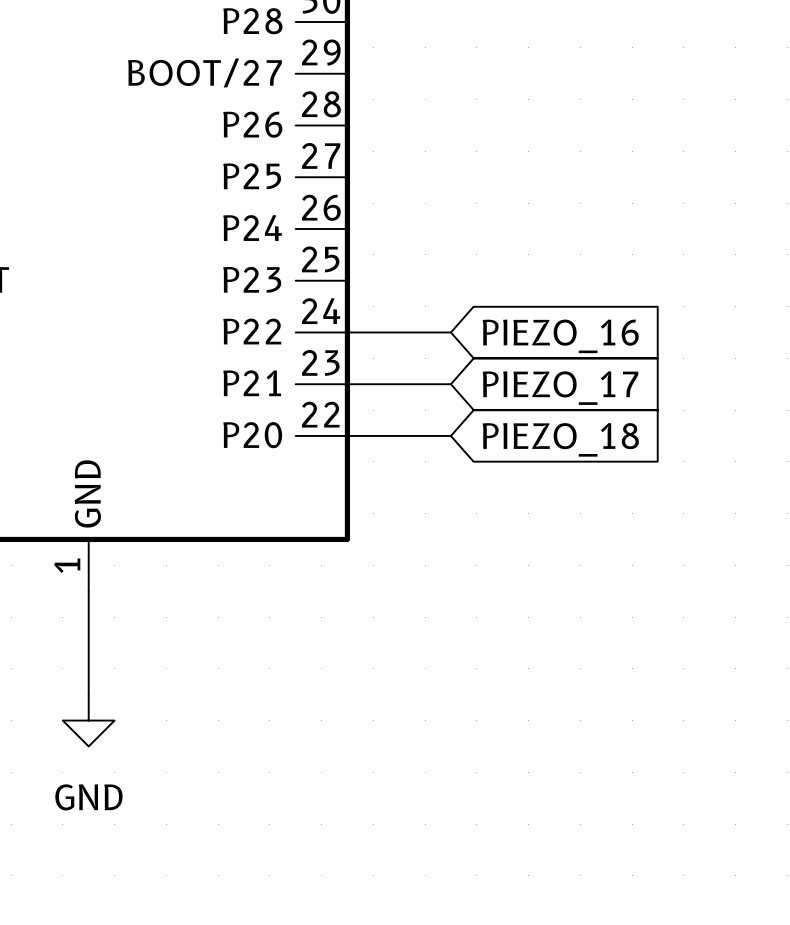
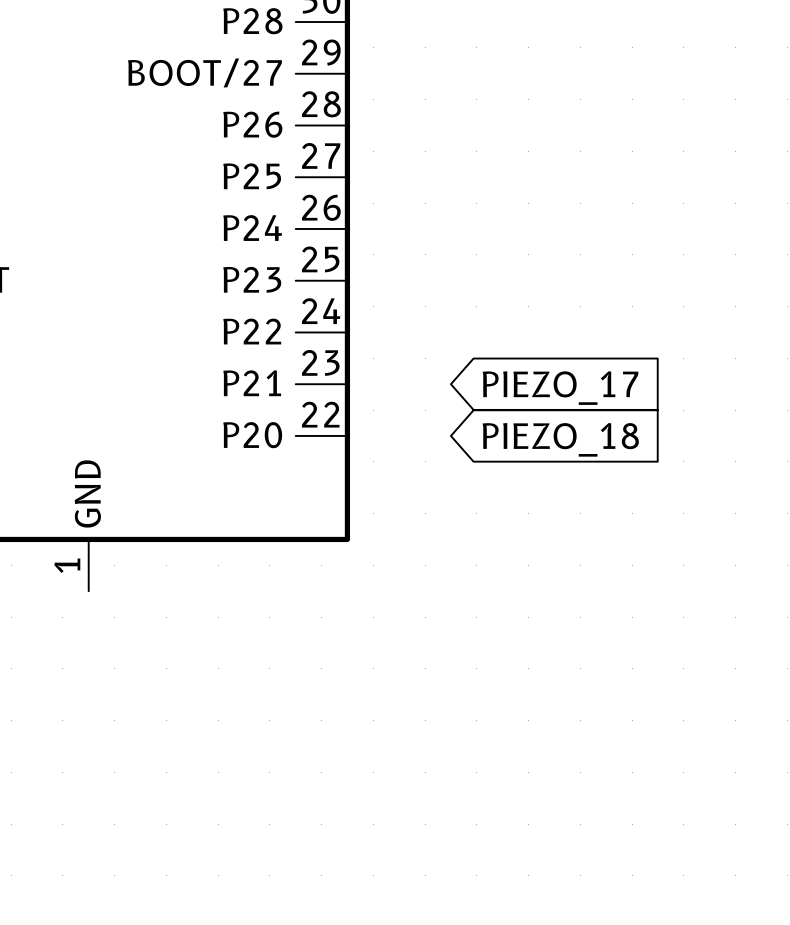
wire: (347, 332) (450, 332) -> none
global label: PIEZO_16 (560, 336) -> none
wire: (347, 384) (450, 384) -> none
wire: (347, 435) (450, 435) -> none
wire: (88, 591) (88, 694) -> none
power symbol: GND (88, 720) -> none

